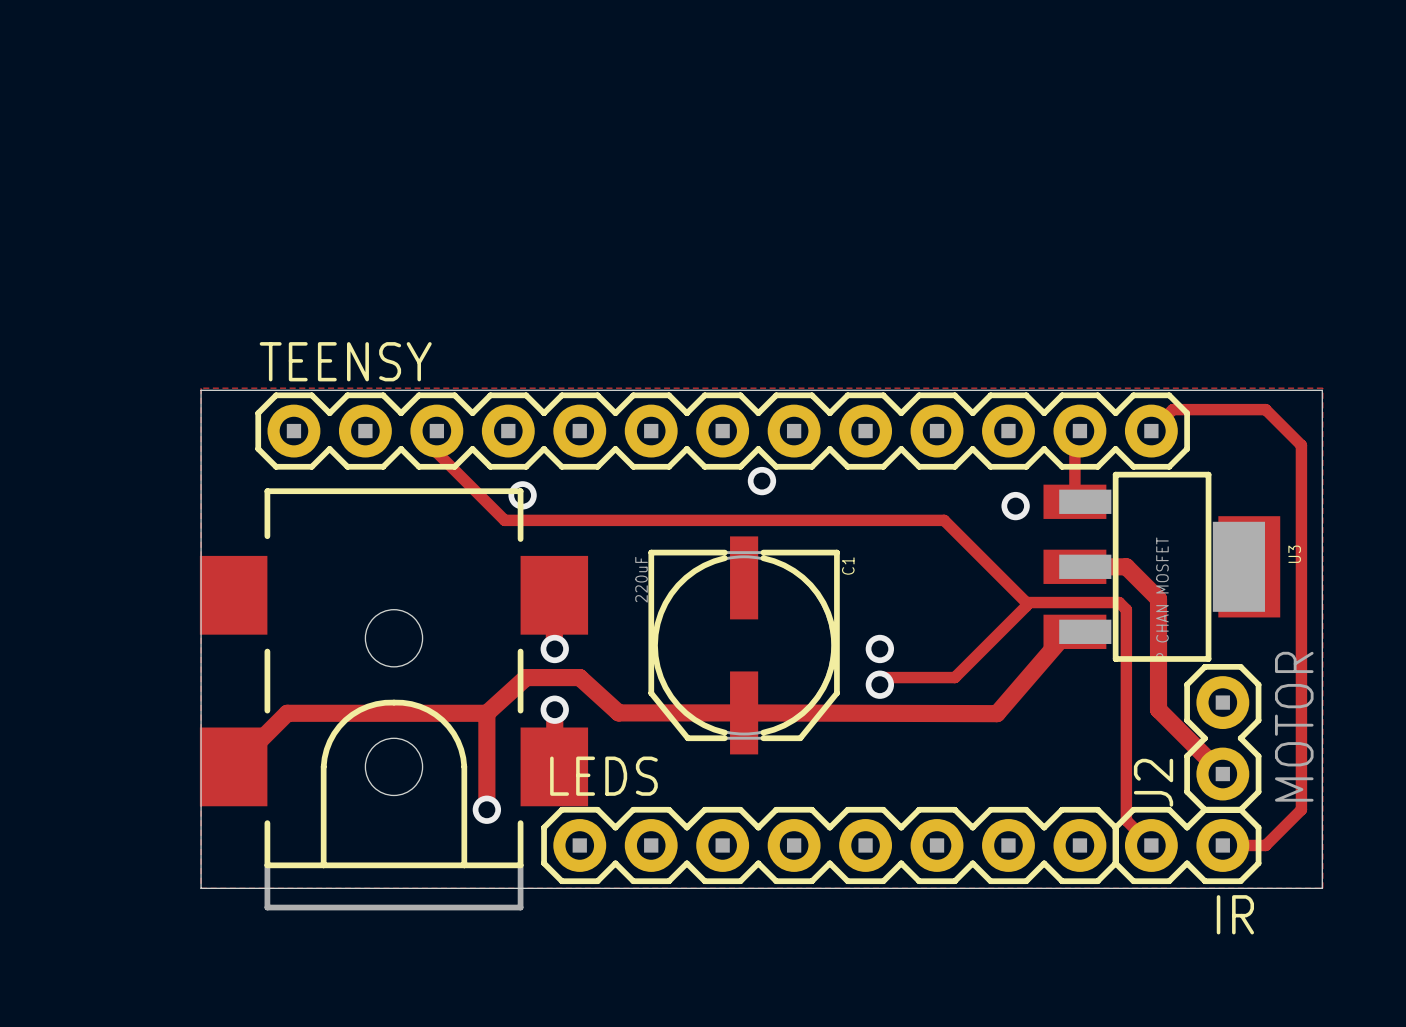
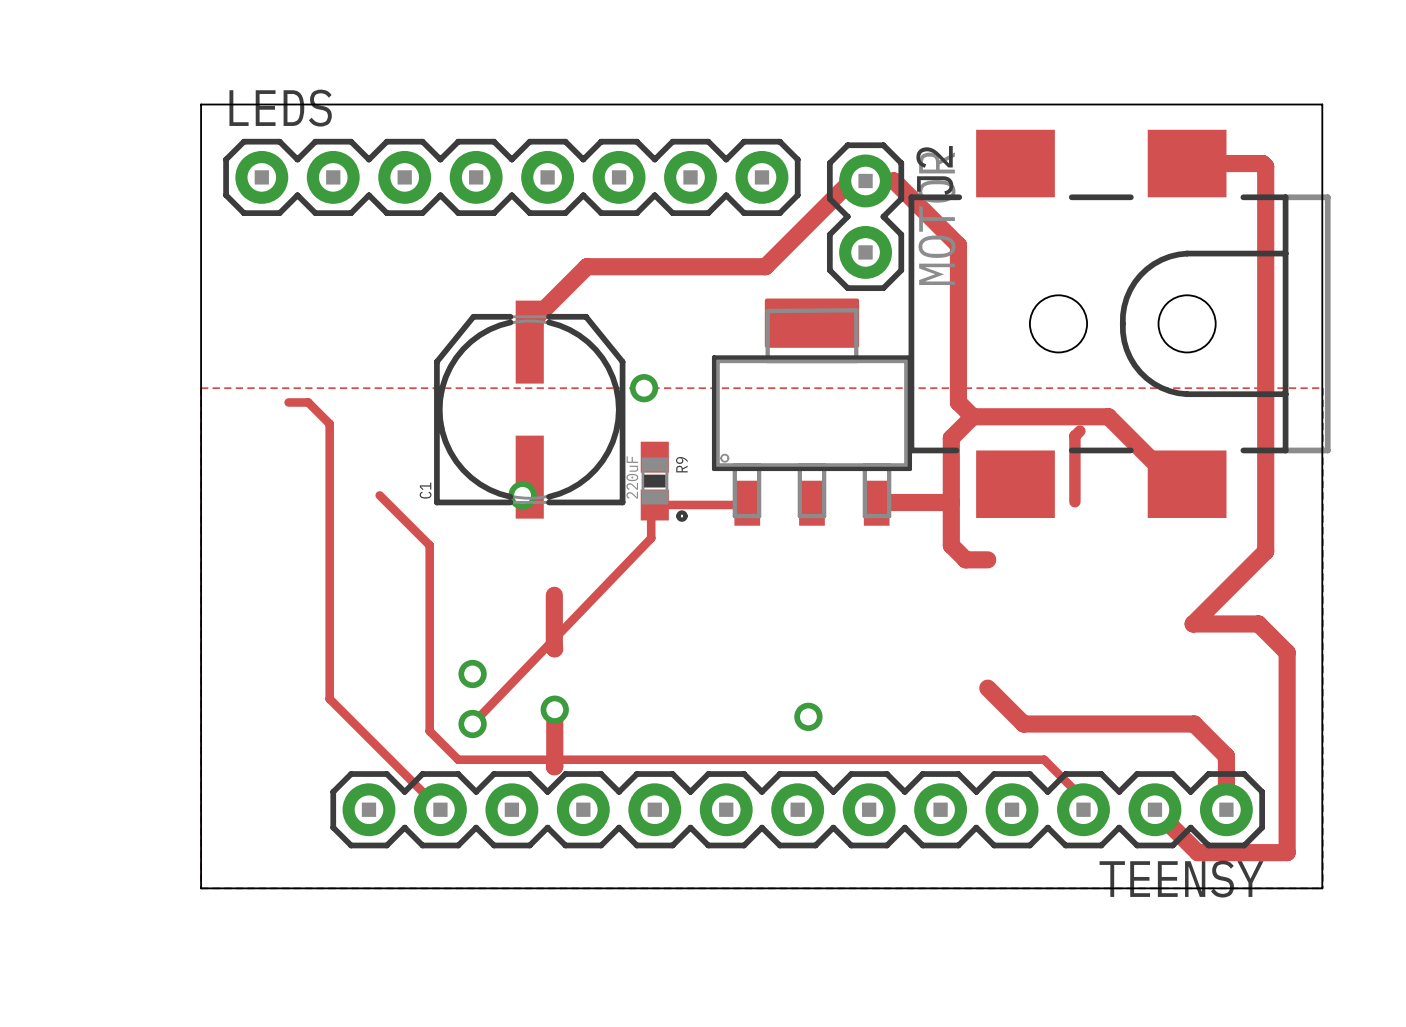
track: none -> (1187, 163) (1262, 163) (1265, 166) (1265, 551) (1193, 623) (1258, 623) (1287, 652) (1287, 852) (1197, 852) (1154, 809)
LEDS: none -> (511, 177)
part: none -> (1119, 323)
track: none -> (529, 342) (536, 316) (586, 266) (765, 266) (851, 180) (894, 180) (958, 245) (958, 402) (972, 416)
TEENSY name position: TEENSY (345, 361) -> TEENSY (1181, 879)
via: none -> (644, 388)
board edge: (201, 390) (1322, 390) -> (201, 390) (201, 104) (1322, 104) (1322, 390)
track: none -> (288, 402) (308, 402) (329, 423) (329, 699) (440, 809)
part: none -> (794, 412)
track: none -> (972, 416) (951, 438) (951, 545) (965, 559) (987, 559)
track: none -> (972, 416) (1108, 416) (1187, 495) (1187, 484)
track: (436, 431) (436, 452) (504, 520) (944, 520) (1026, 602) -> none
TEENSY position: (722, 431) -> (797, 809)
track: (1151, 431) (1172, 409) (1265, 409) (1301, 445) (1301, 809) (1265, 845) (1222, 845) -> none
R9: none -> (654, 481)
via: (761, 481) -> none
track: none -> (379, 495) (429, 545) (429, 731) (458, 759) (1044, 759) (1083, 799) (1083, 809)
track: none -> (951, 502) (887, 502) (879, 509)
track: none -> (747, 503) (745, 504) (654, 504)
via: (1015, 506) -> none
track: none -> (651, 509) (651, 538) (472, 724)
track: (1074, 566) (1126, 566) (1158, 598) (1158, 709) (1222, 774) -> none
U3: P CHAN MOSFET (1161, 566) -> none
track: (1026, 602) (1119, 602) (1126, 609) (1126, 820) (1151, 845) -> none
track: (1026, 602) (1026, 606) (954, 677) (883, 677) (879, 684) -> none
track: (1074, 631) (1071, 627) (997, 713) (618, 712) (579, 677) (526, 677) (486, 713) -> none
C1 rotation: 0° (744, 645) -> 180° (529, 409)
C1 position: (744, 645) -> (529, 409)
via: (554, 648) -> none
via: (879, 648) -> none
via: none -> (472, 673)
via: (879, 684) -> none
track: none -> (987, 688) (1023, 724) (1194, 724) (1226, 756) (1226, 809)
part: (393, 699) -> none
track: (486, 713) (287, 713) (233, 766) -> none
track: (486, 713) (486, 809) -> none
via: none -> (808, 716)
via: none -> (472, 724)
J2 position: (1222, 738) -> (865, 216)
J2 name position: J2 (1153, 782) -> J2 (934, 170)
via: (486, 809) -> none
LEDS: (829, 845) -> none
IR: (1187, 845) -> none

